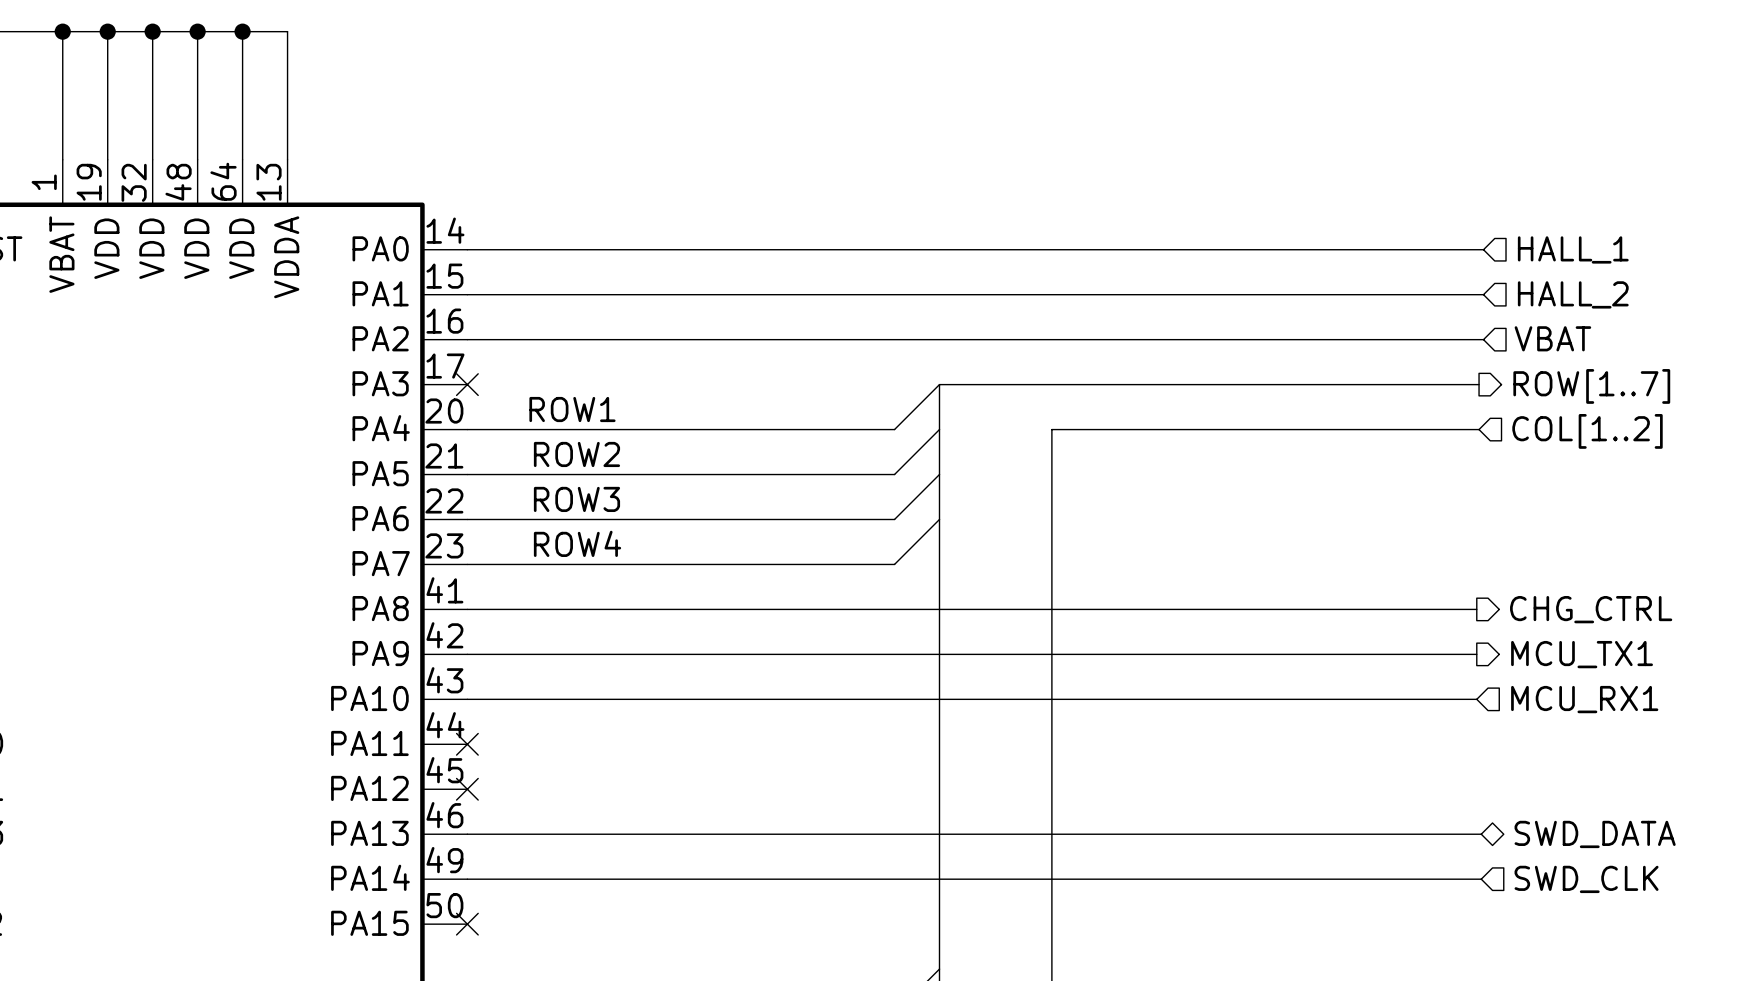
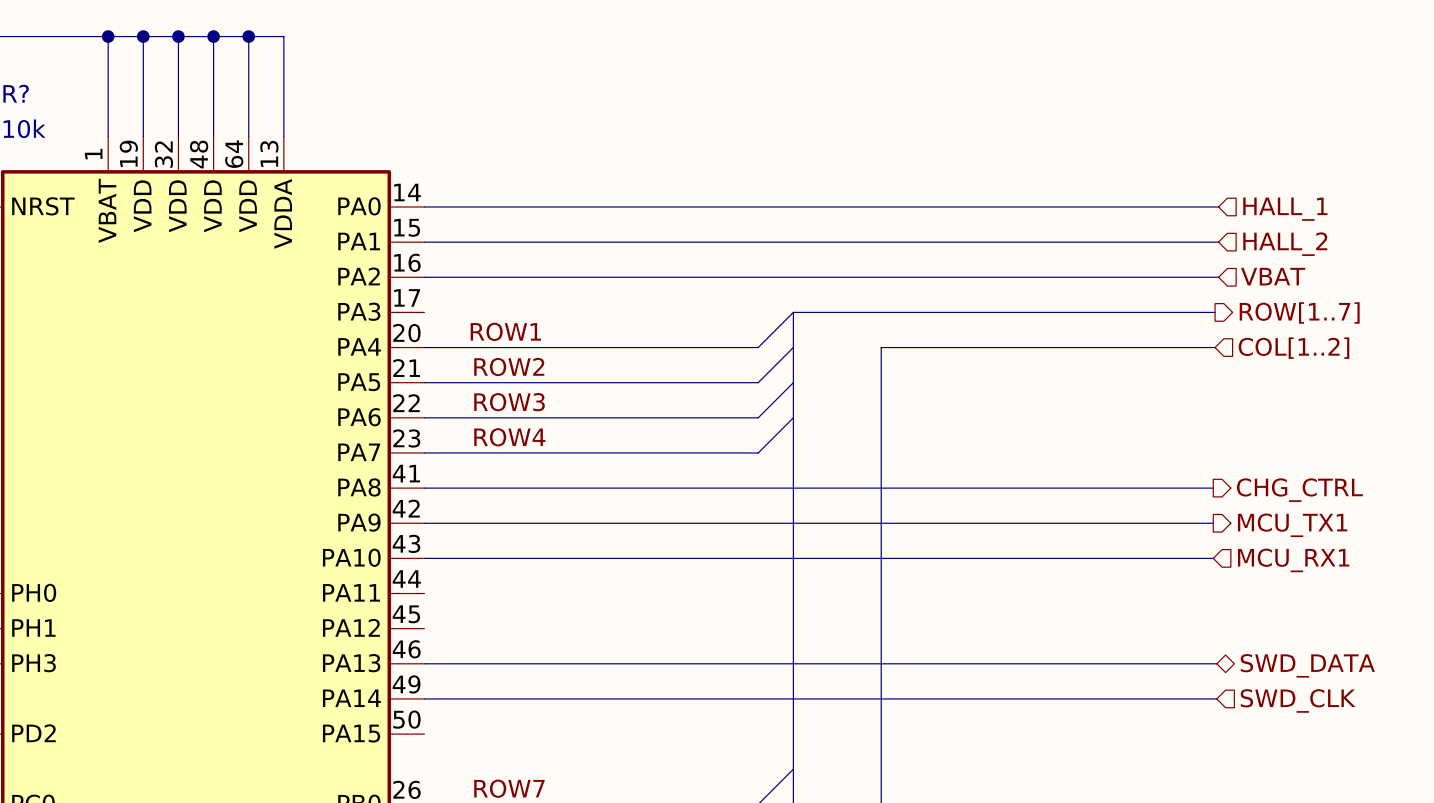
no-connect mark: (467, 384) -> none
no-connect mark: (467, 744) -> none
no-connect mark: (467, 789) -> none
no-connect mark: (467, 924) -> none

